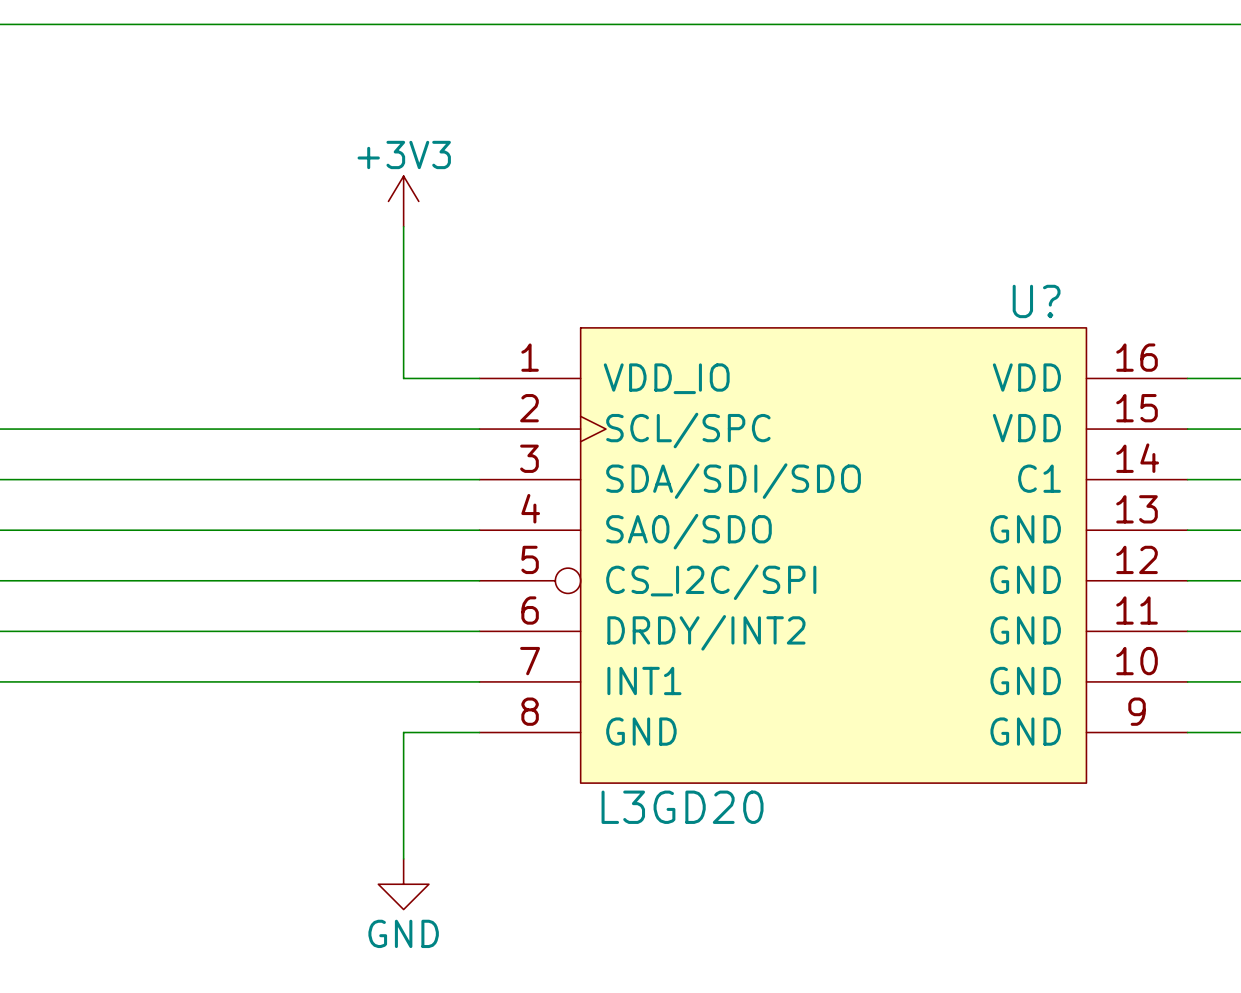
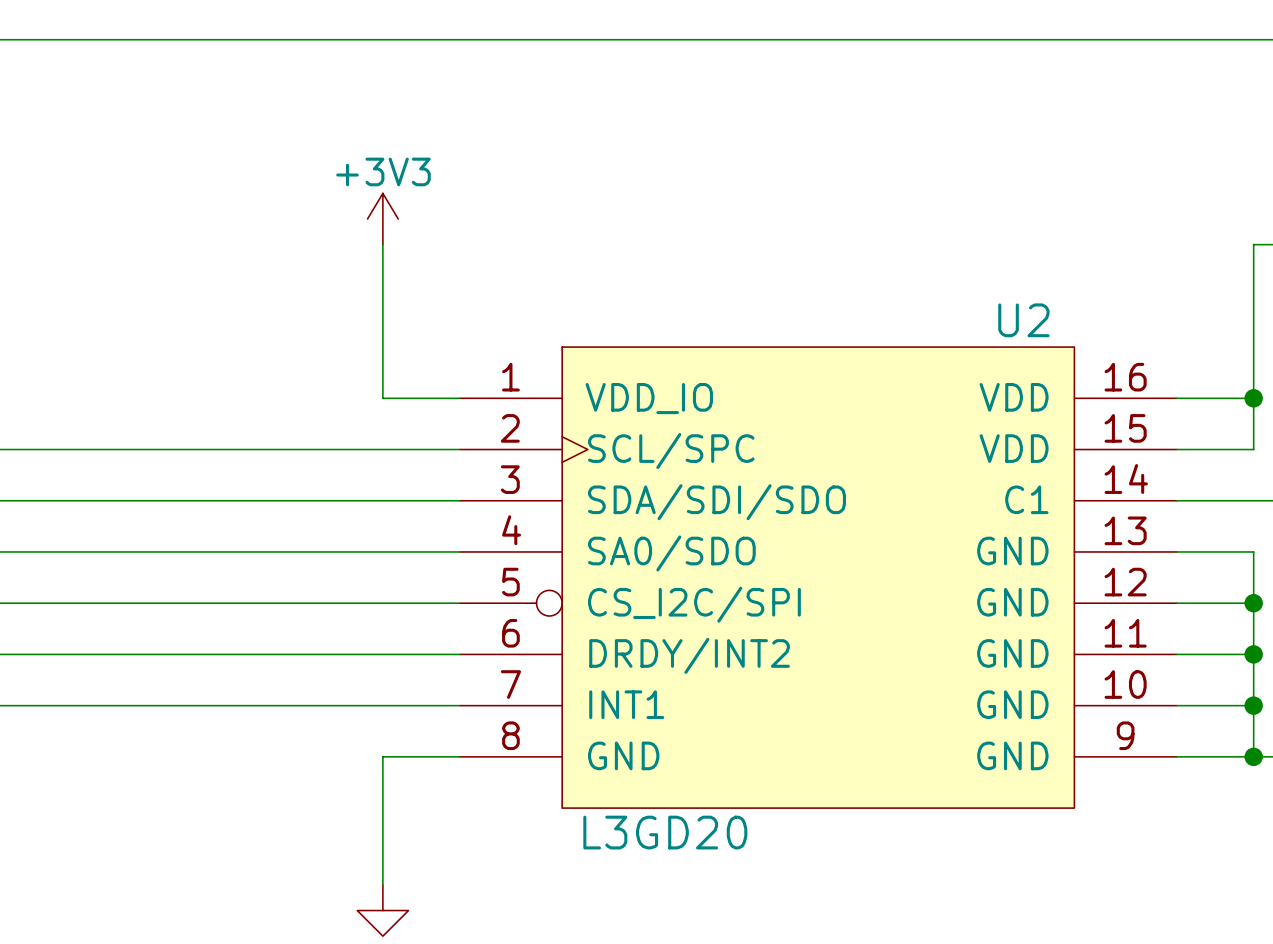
U? name: U? (1036, 301) -> U2 (1023, 320)

